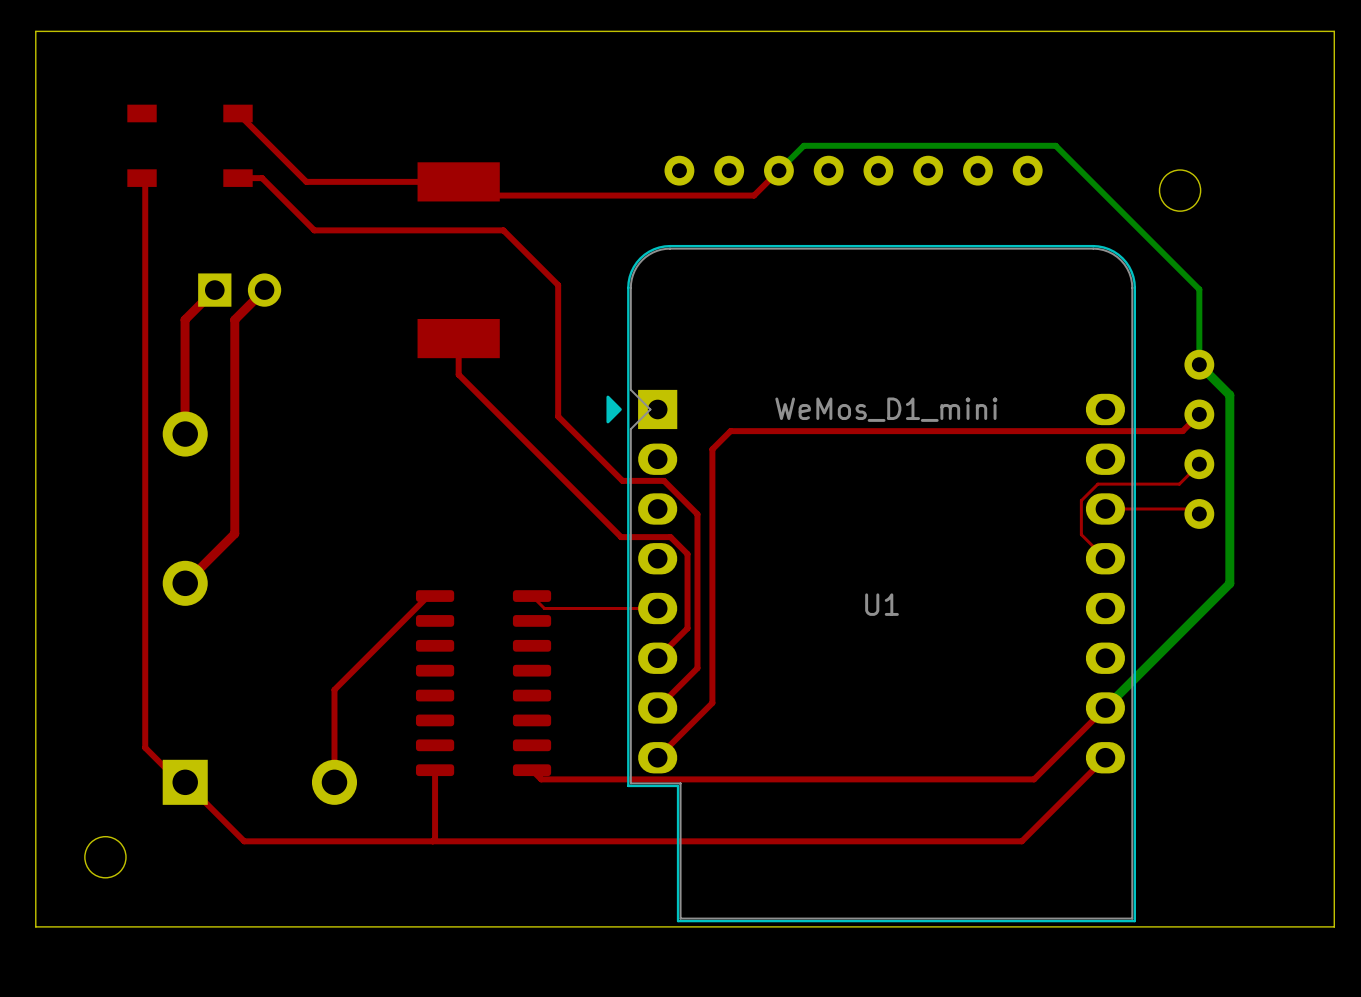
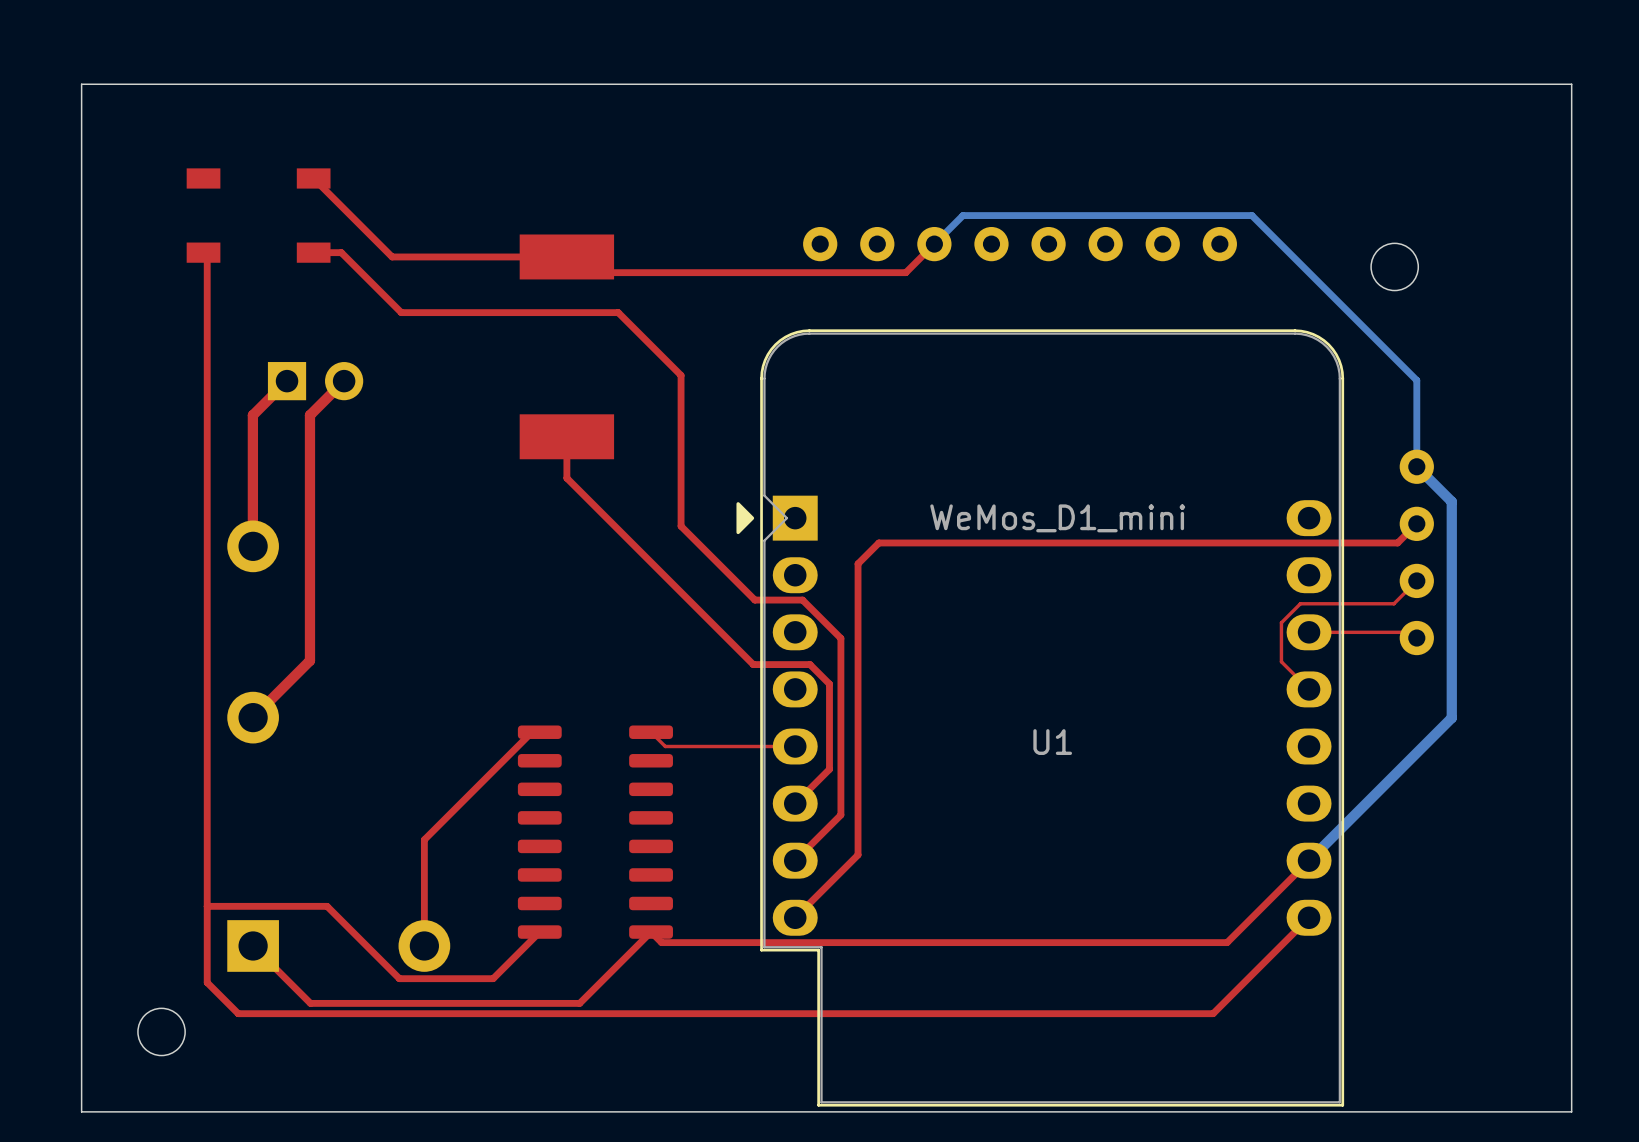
top track: (145, 747) (179, 782) -> none
top track: (435, 770) (435, 839) (432, 841) -> (539, 932) (493, 978) (399, 978) (327, 906) (207, 906) (207, 982) (238, 1013) (320, 1013)
top track: (235, 832) (244, 841) -> (310, 1003) (579, 1003) (651, 932)

